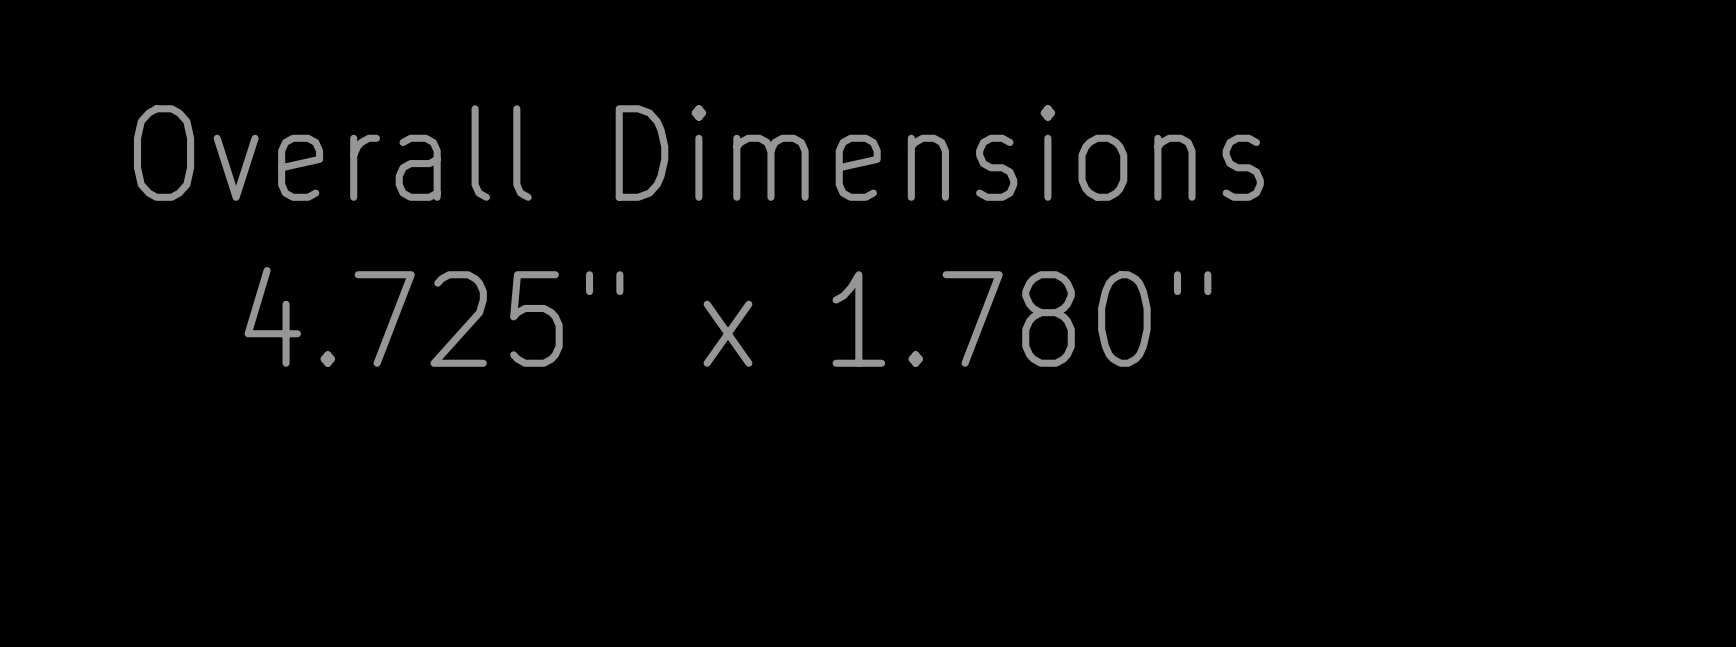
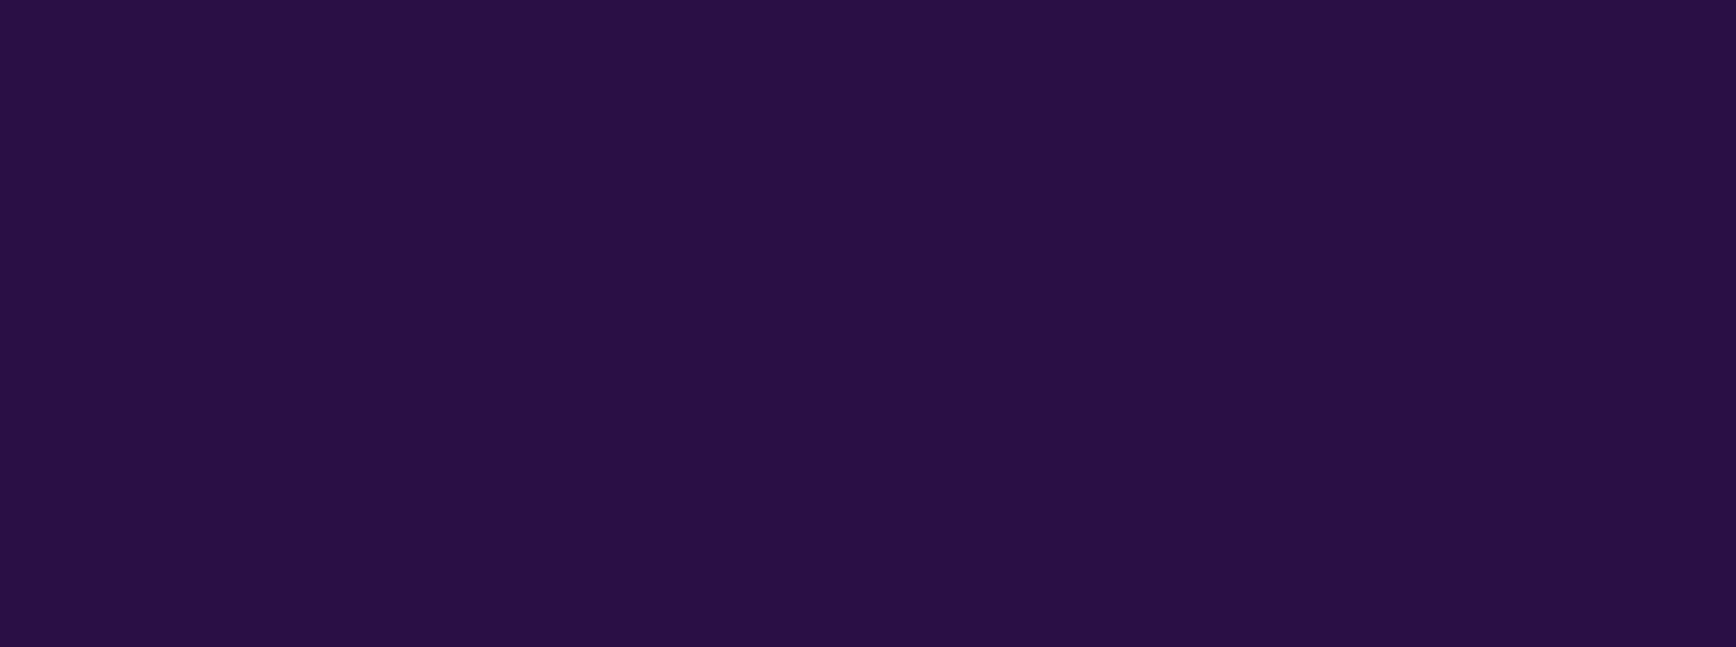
text: Overall Dimensions (698, 153) -> none
text: 4.725" x 1.780" (727, 316) -> none

